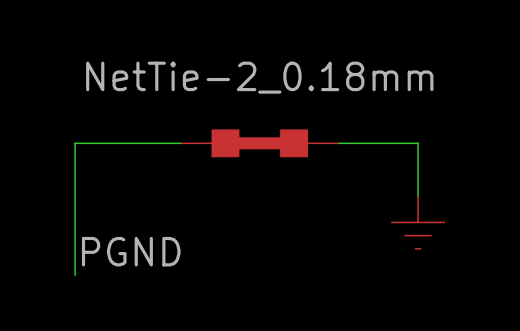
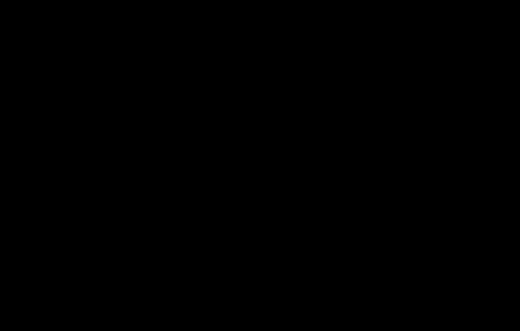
wire: (180, 143) (75, 143) (75, 275) -> none
part: NetTie-2_0.18mm (259, 143) -> none
wire: (338, 143) (418, 143) (418, 196) -> none
power symbol: (418, 222) -> none
label: PGND (131, 251) -> none

